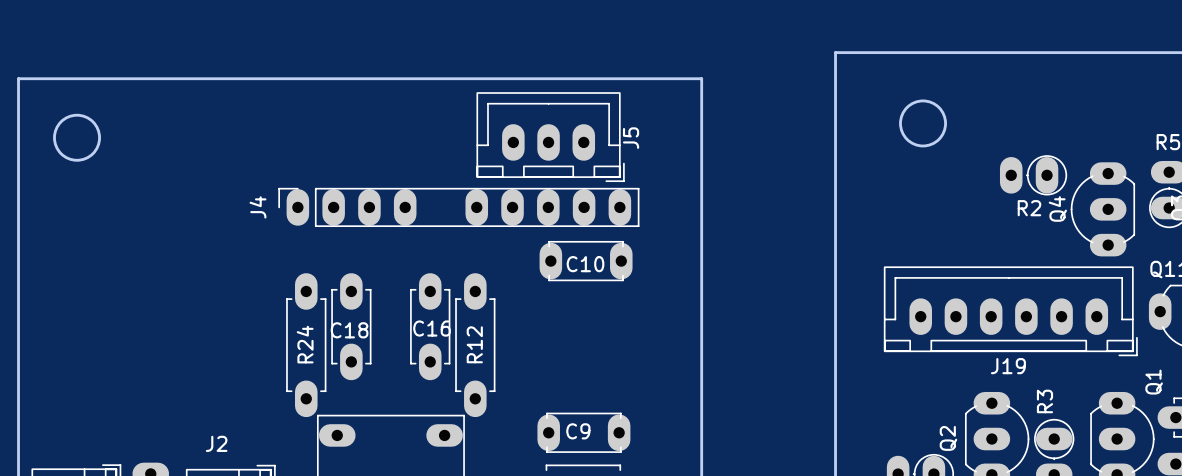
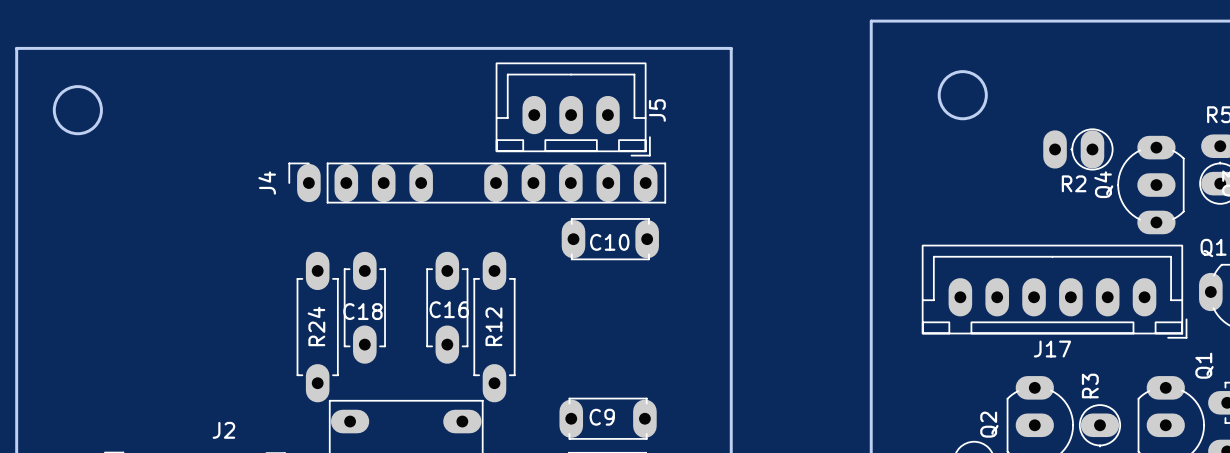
J19 name: J19 (1008, 366) -> J17 (1052, 349)

